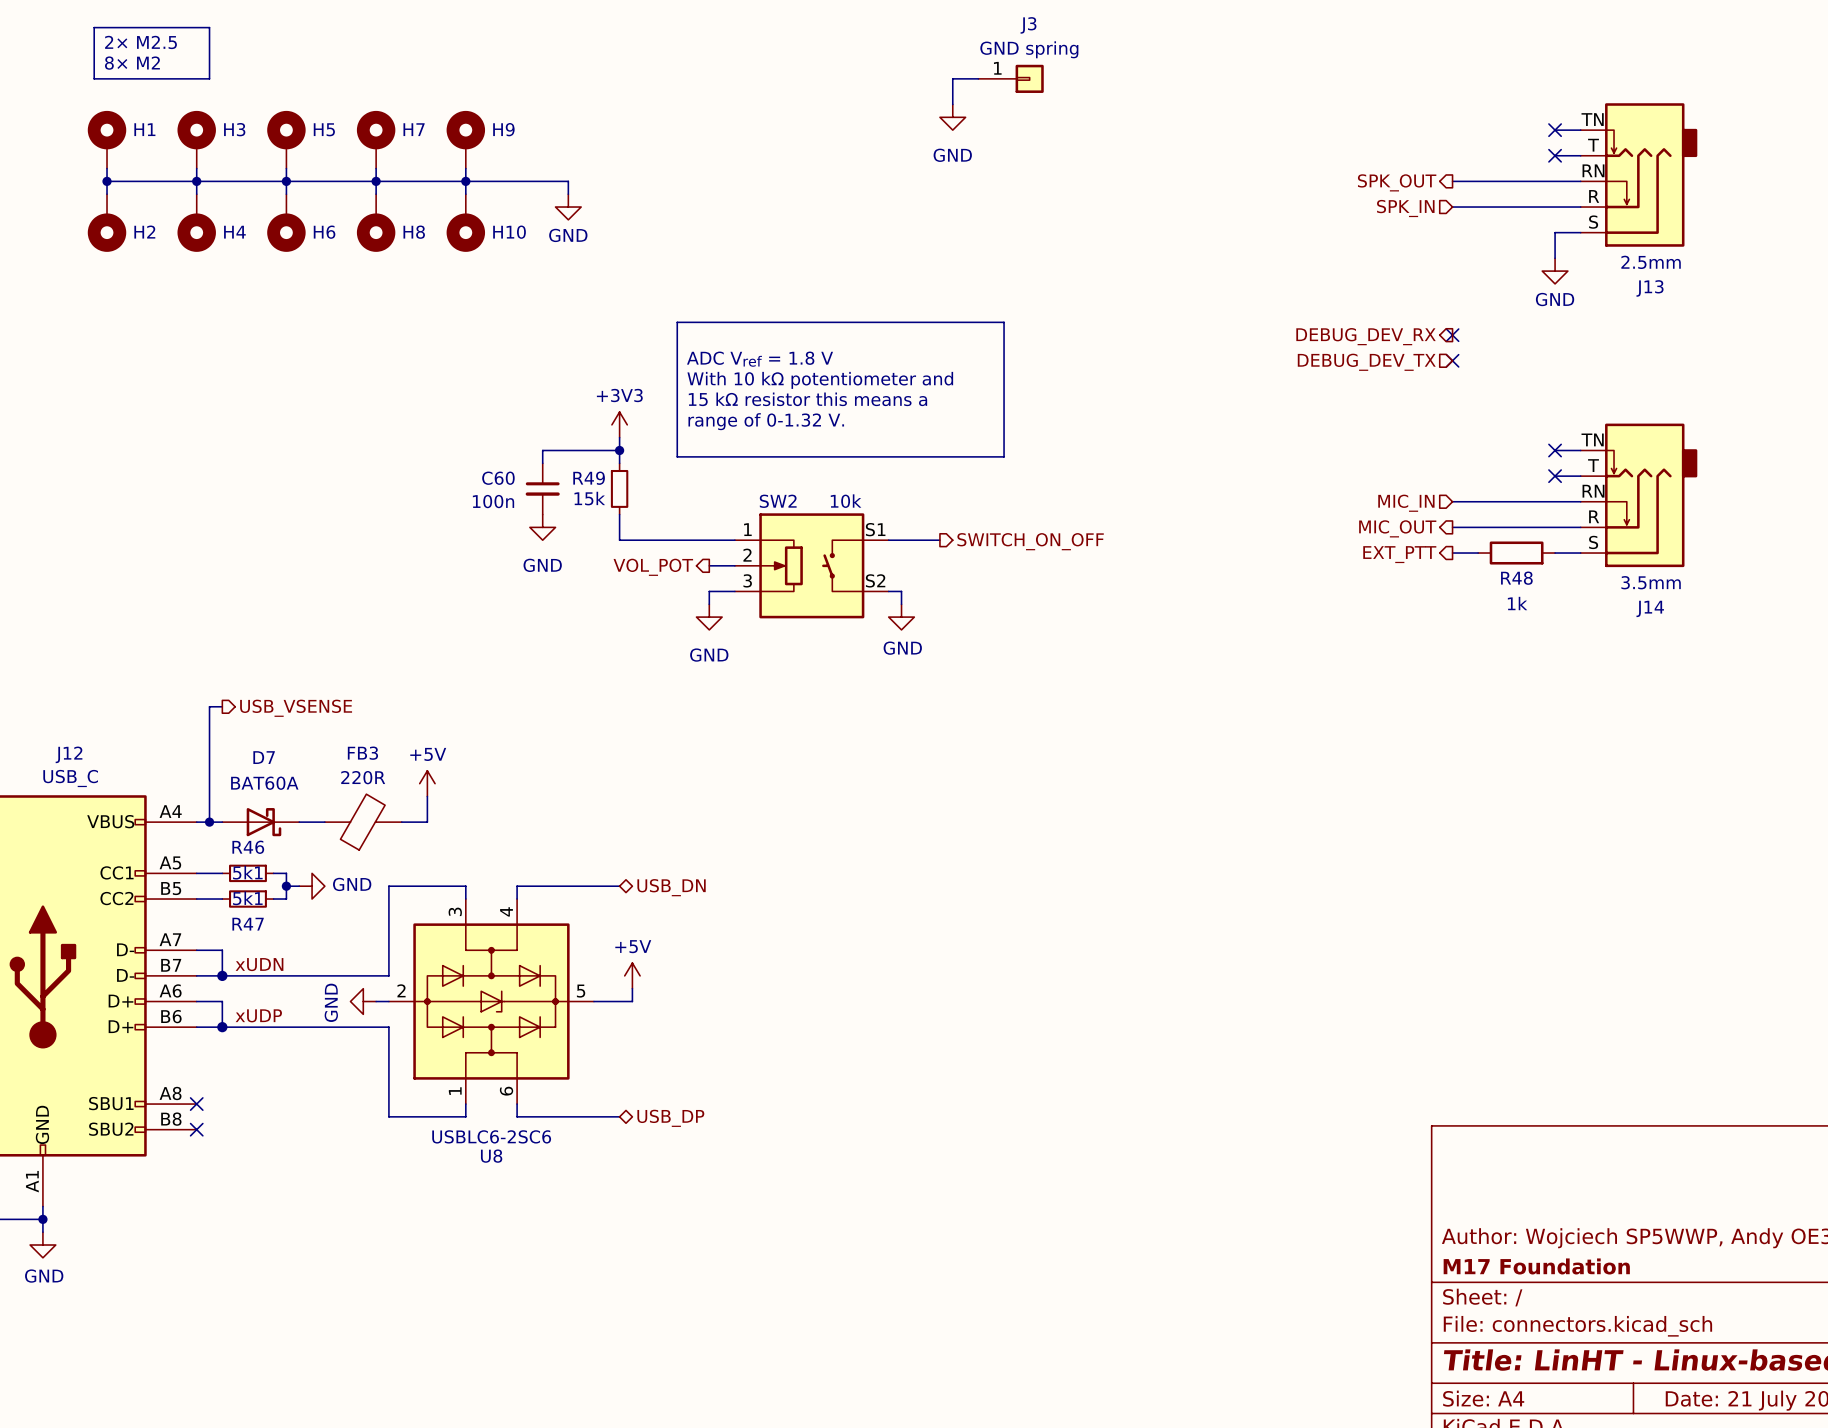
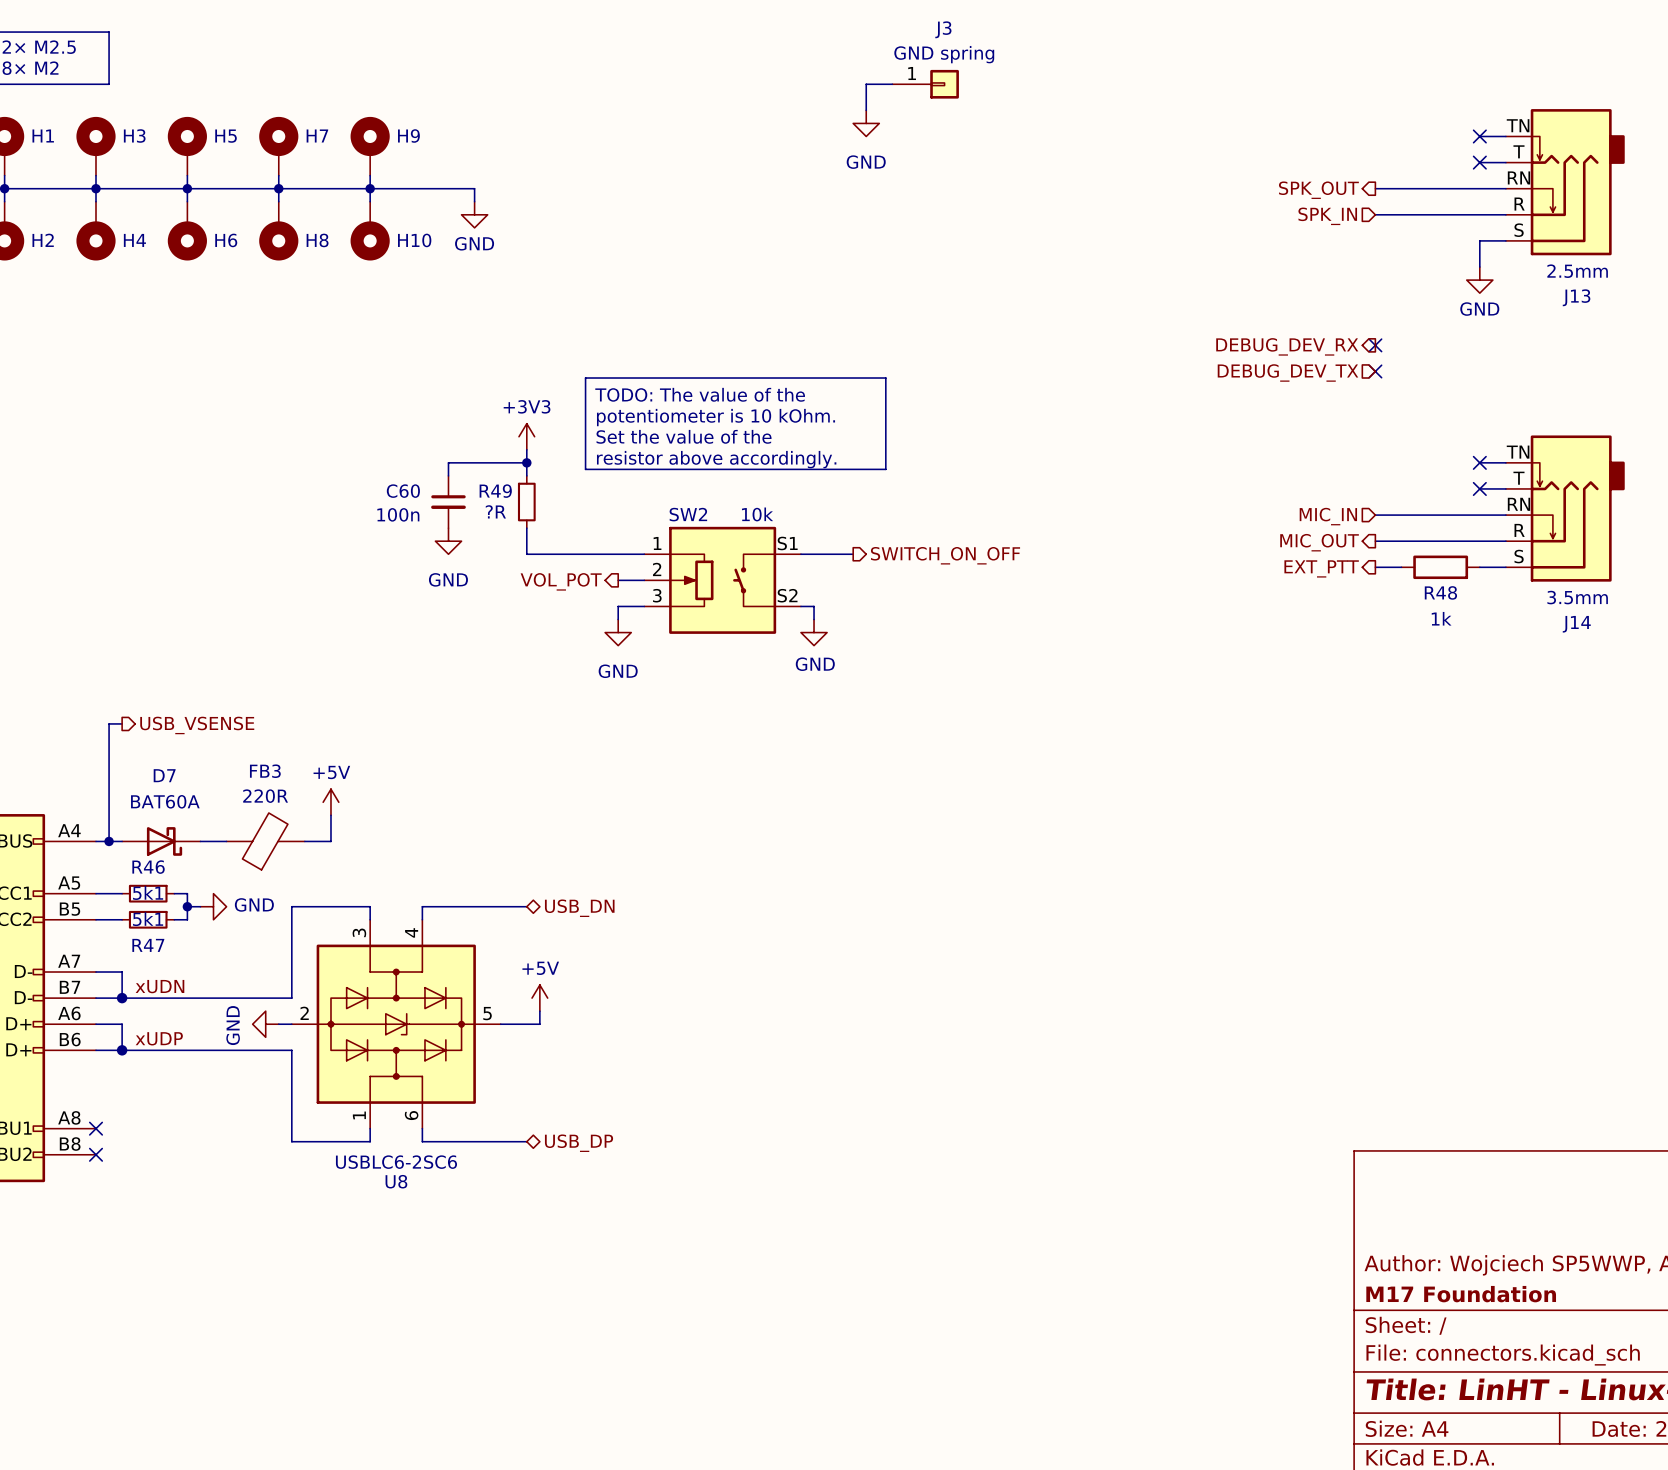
text: ADC Vref = 1.8 V (760, 359) -> none
line: (677, 367) (677, 322) (1004, 322) (1004, 456) (677, 456) -> (585, 378) (885, 378) (885, 469) (585, 469)
text: With 10 kΩ potentiometer and (820, 380) -> TODO: The value of the (700, 394)
text: 15 kΩ resistor this means a (807, 399) -> potentiometer is 10 kOhm. (716, 417)
text: range of 0-1.32 V. (766, 421) -> Set the value of the (684, 436)
text: none -> resistor above accordingly. (716, 459)
R49 value: 15k (589, 498) -> ?R (495, 511)

